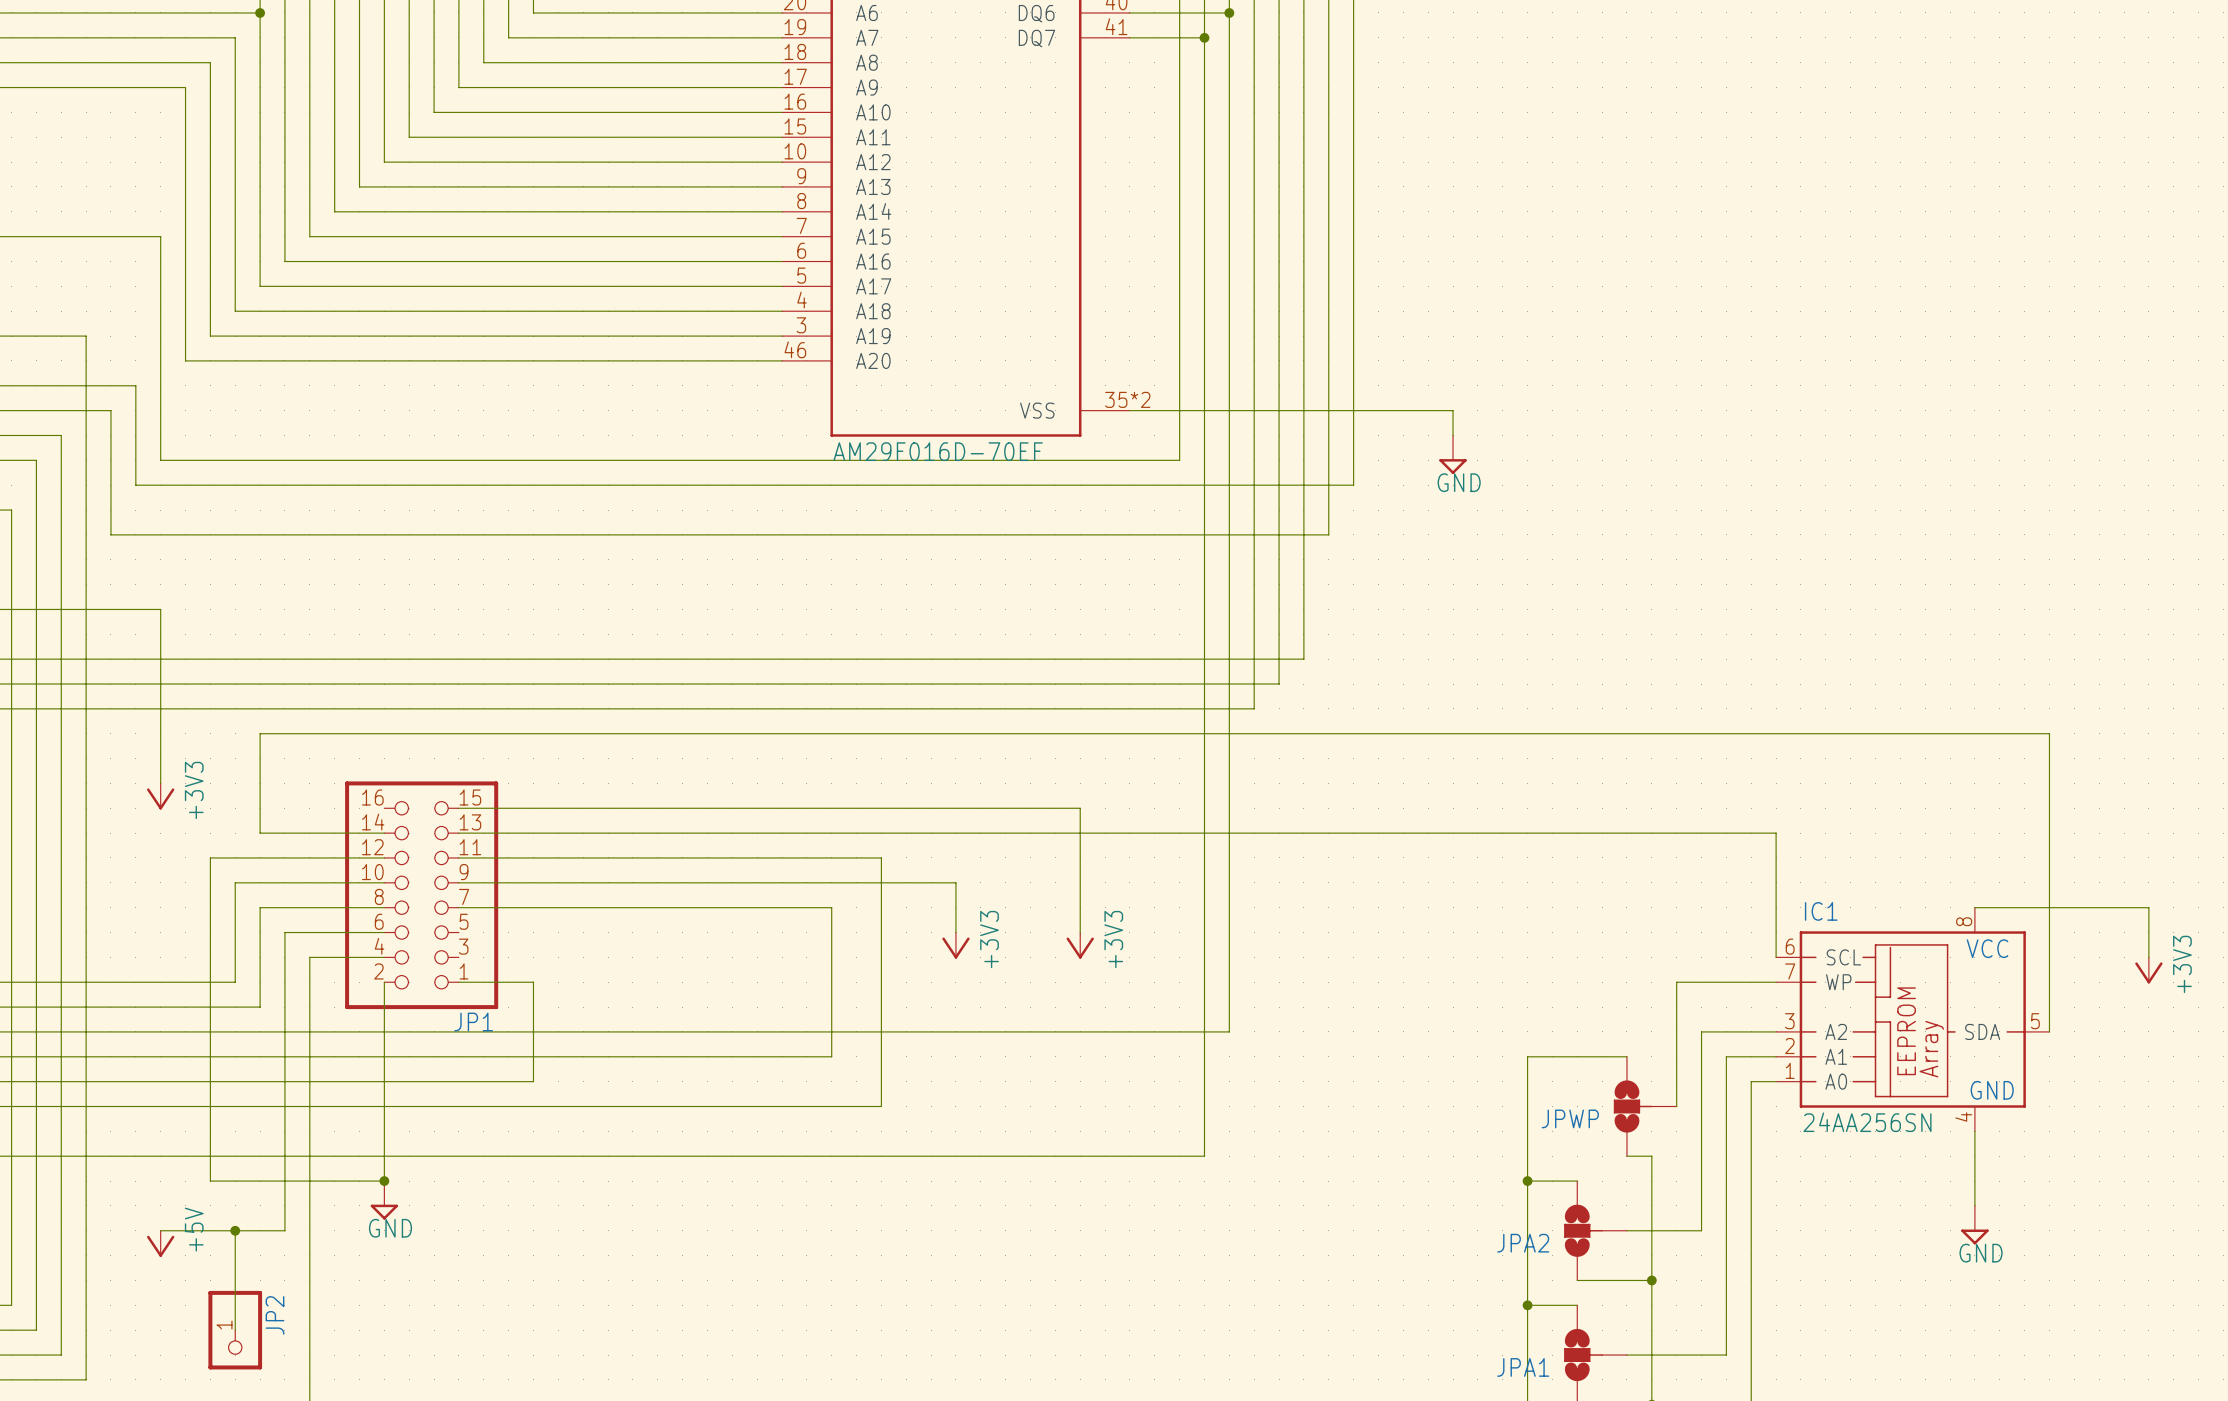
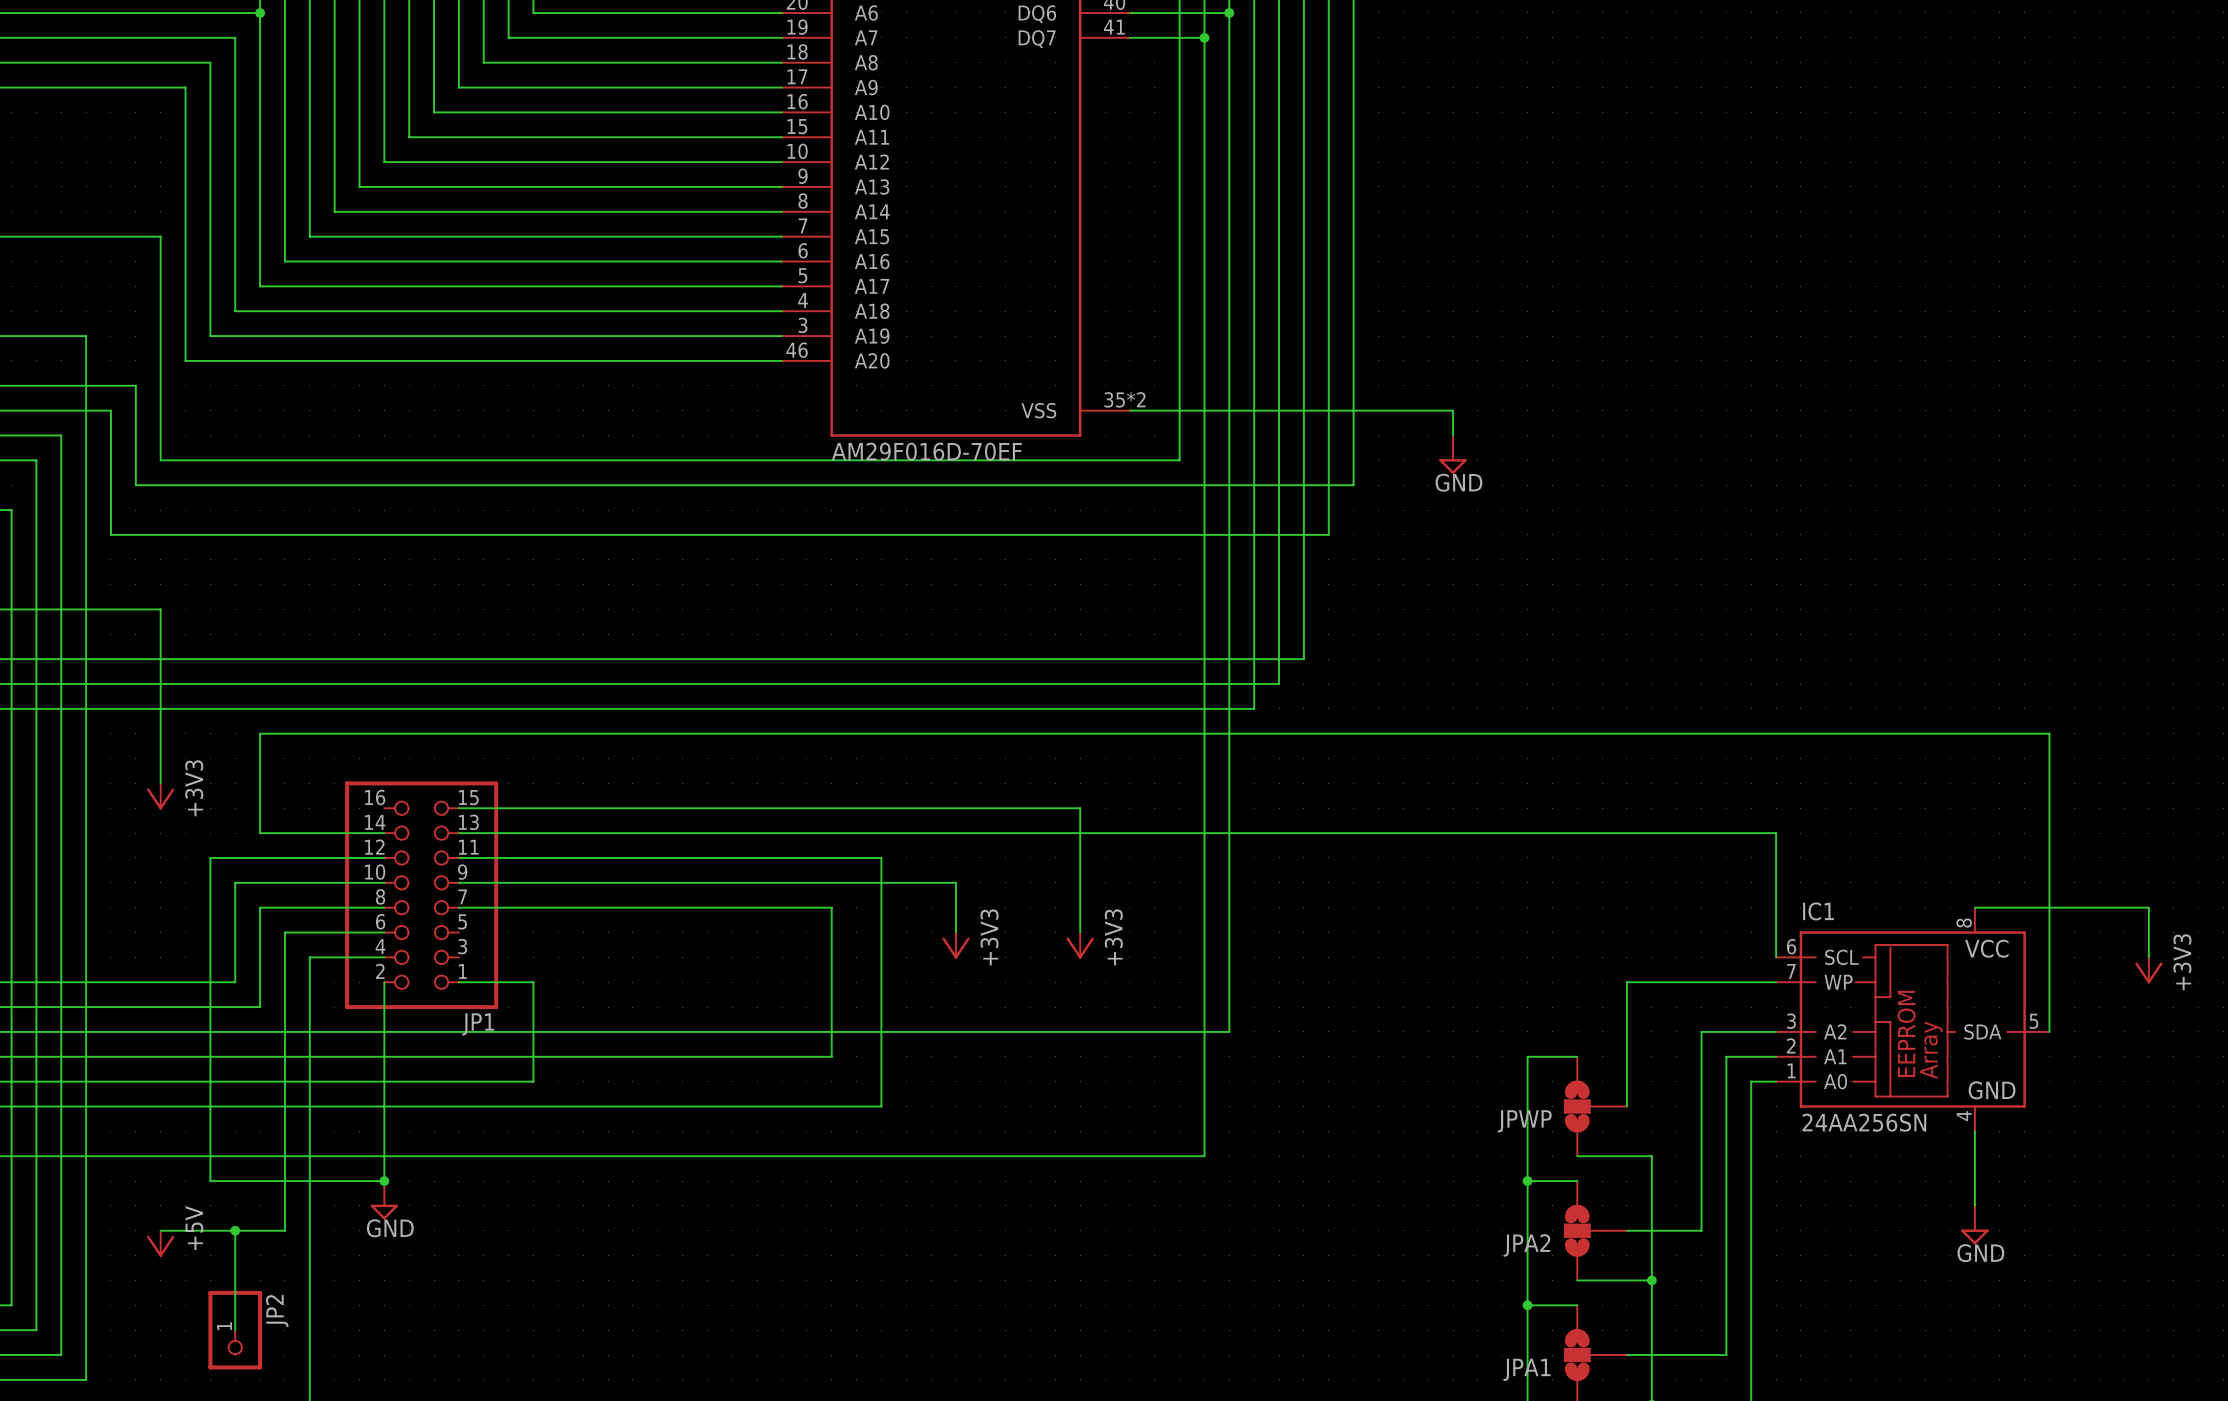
wire: (1676, 982) (1676, 1106) -> (1676, 982) (1626, 982) (1626, 1106)
wire: (1577, 1056) (1626, 1056) -> (1577, 1156) (1626, 1156)
JPWP position: (1645, 1106) -> (1595, 1106)

